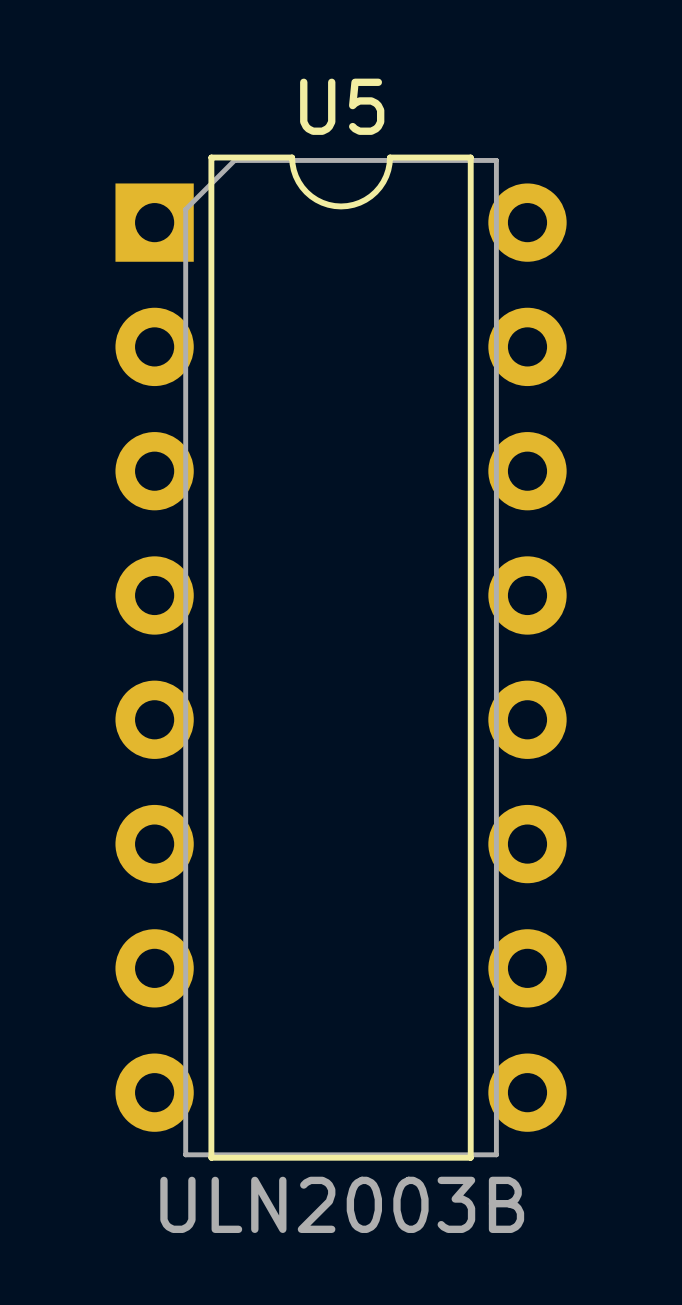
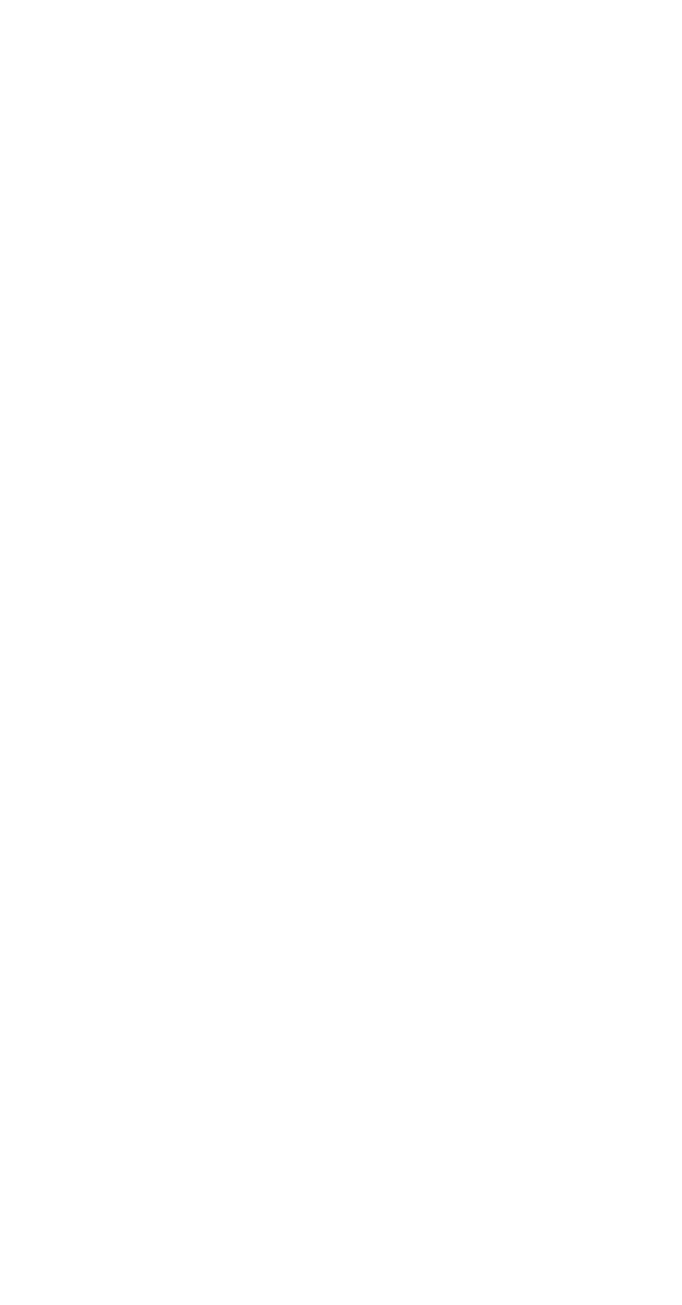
U5: ULN2003B (341, 657) -> none

